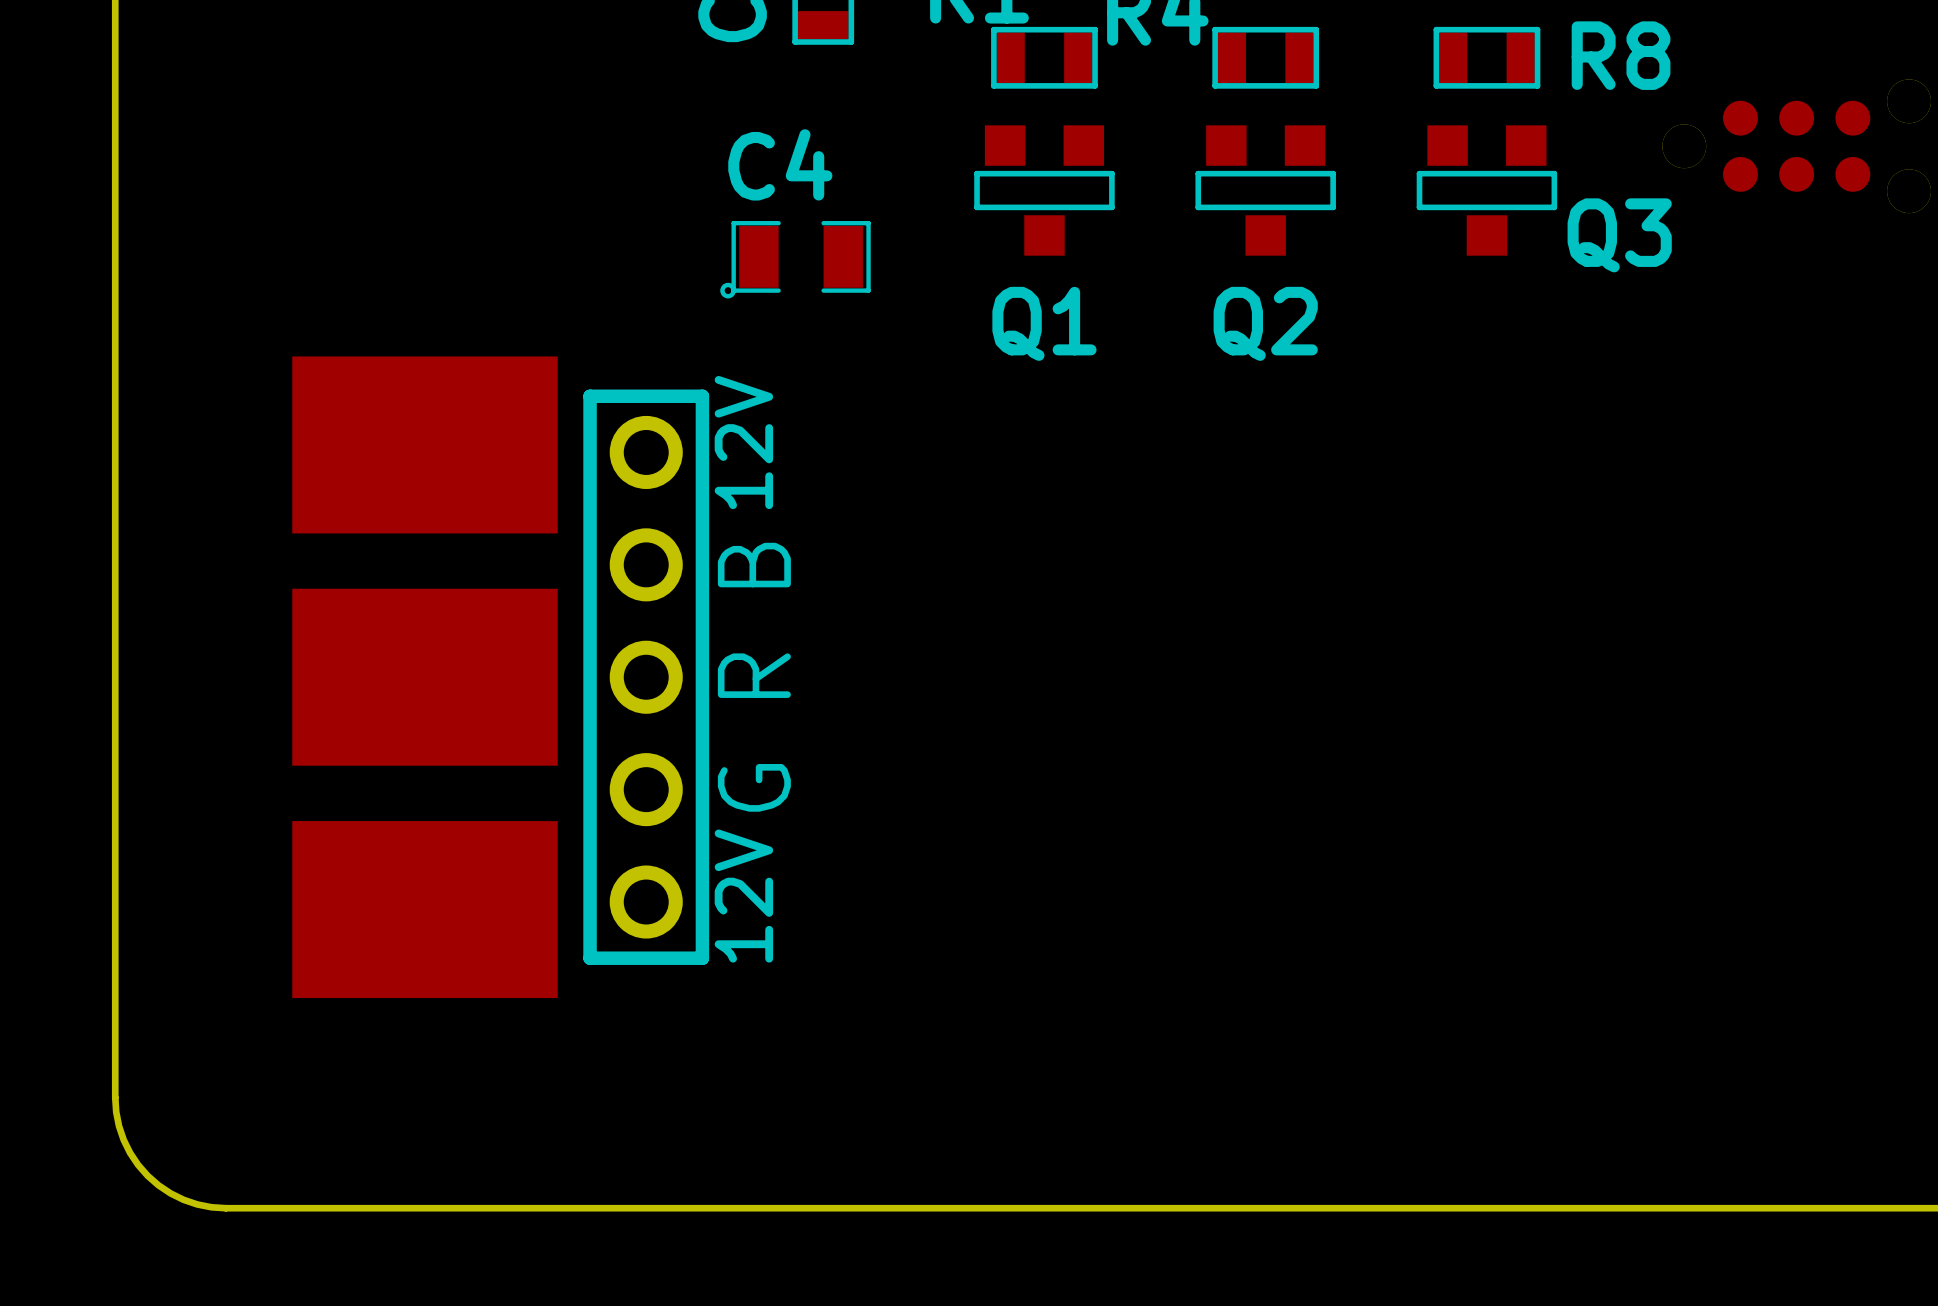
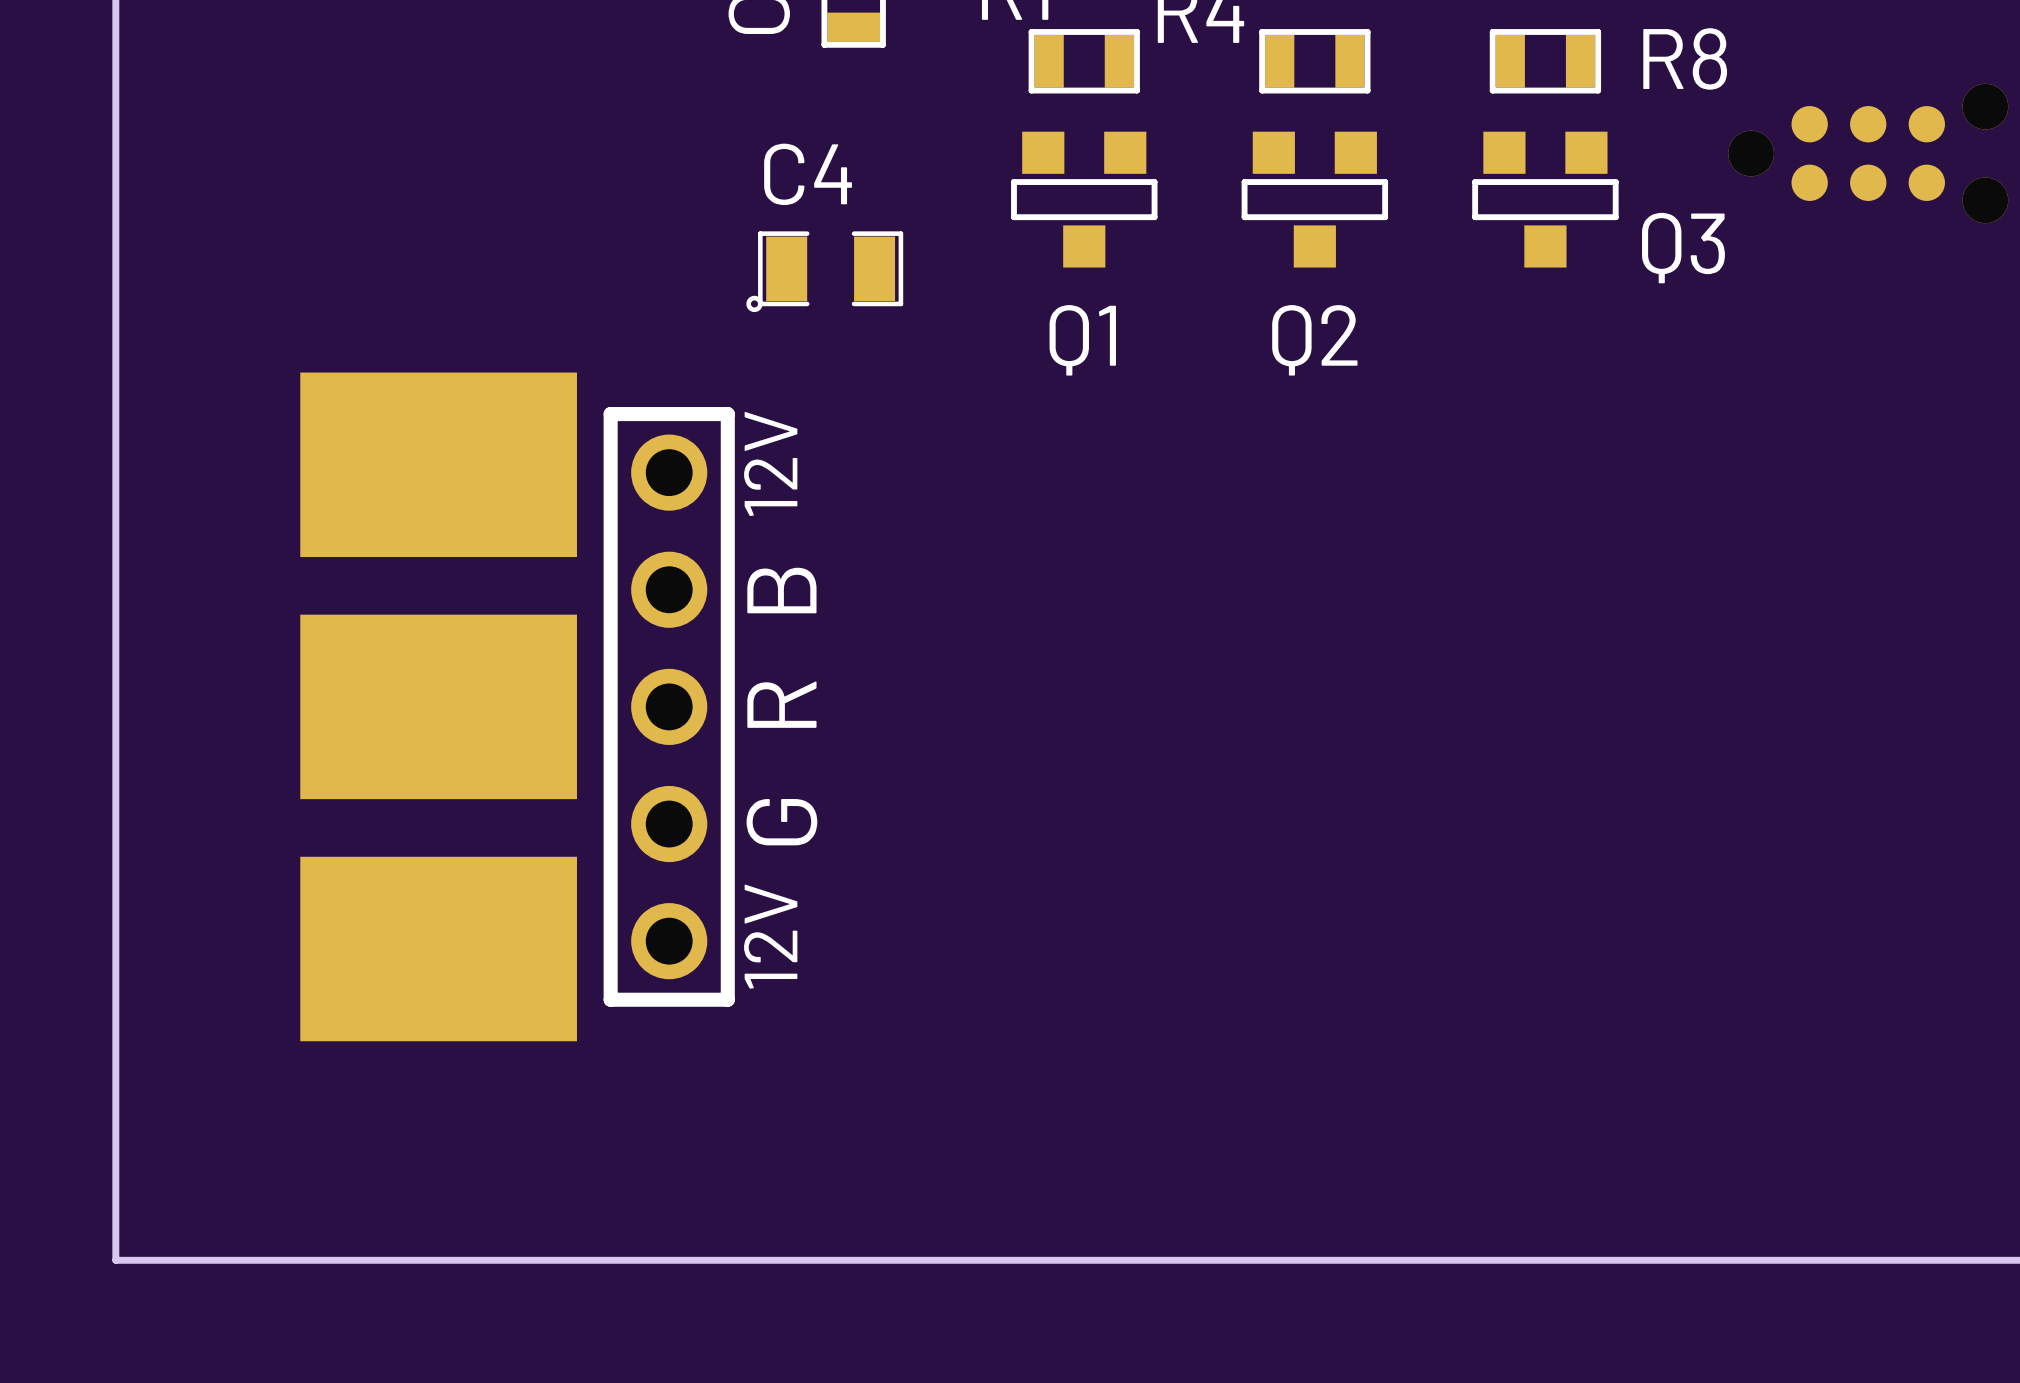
board edge: (115, 1097) (116, 1112) (123, 1139) (130, 1152) (147, 1175) (170, 1193) (183, 1199) (211, 1207) (225, 1208) -> (115, 1145) (115, 1260) (231, 1260)

